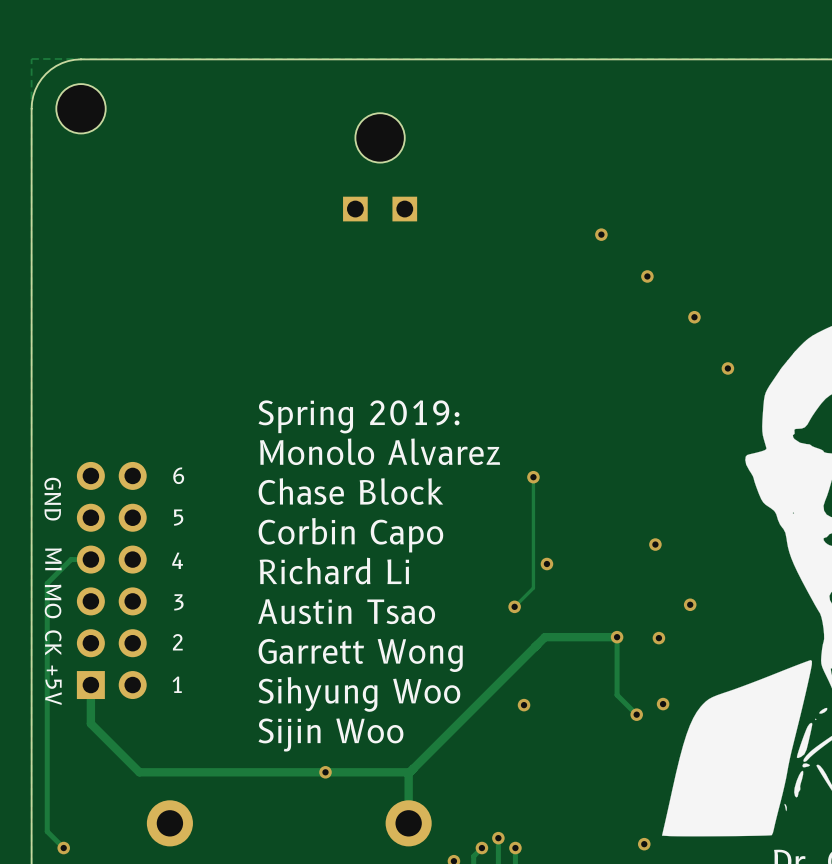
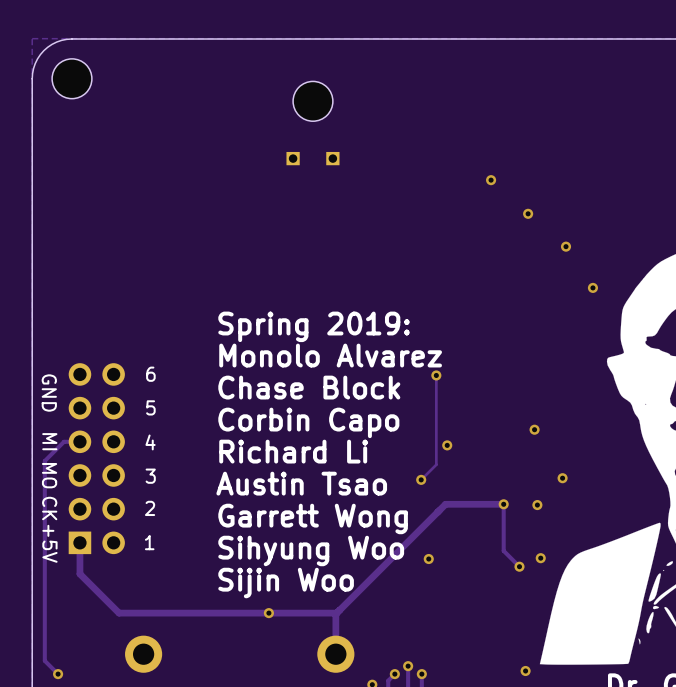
part footprint: [343, 113, 418, 222] -> [286, 81, 340, 166]

